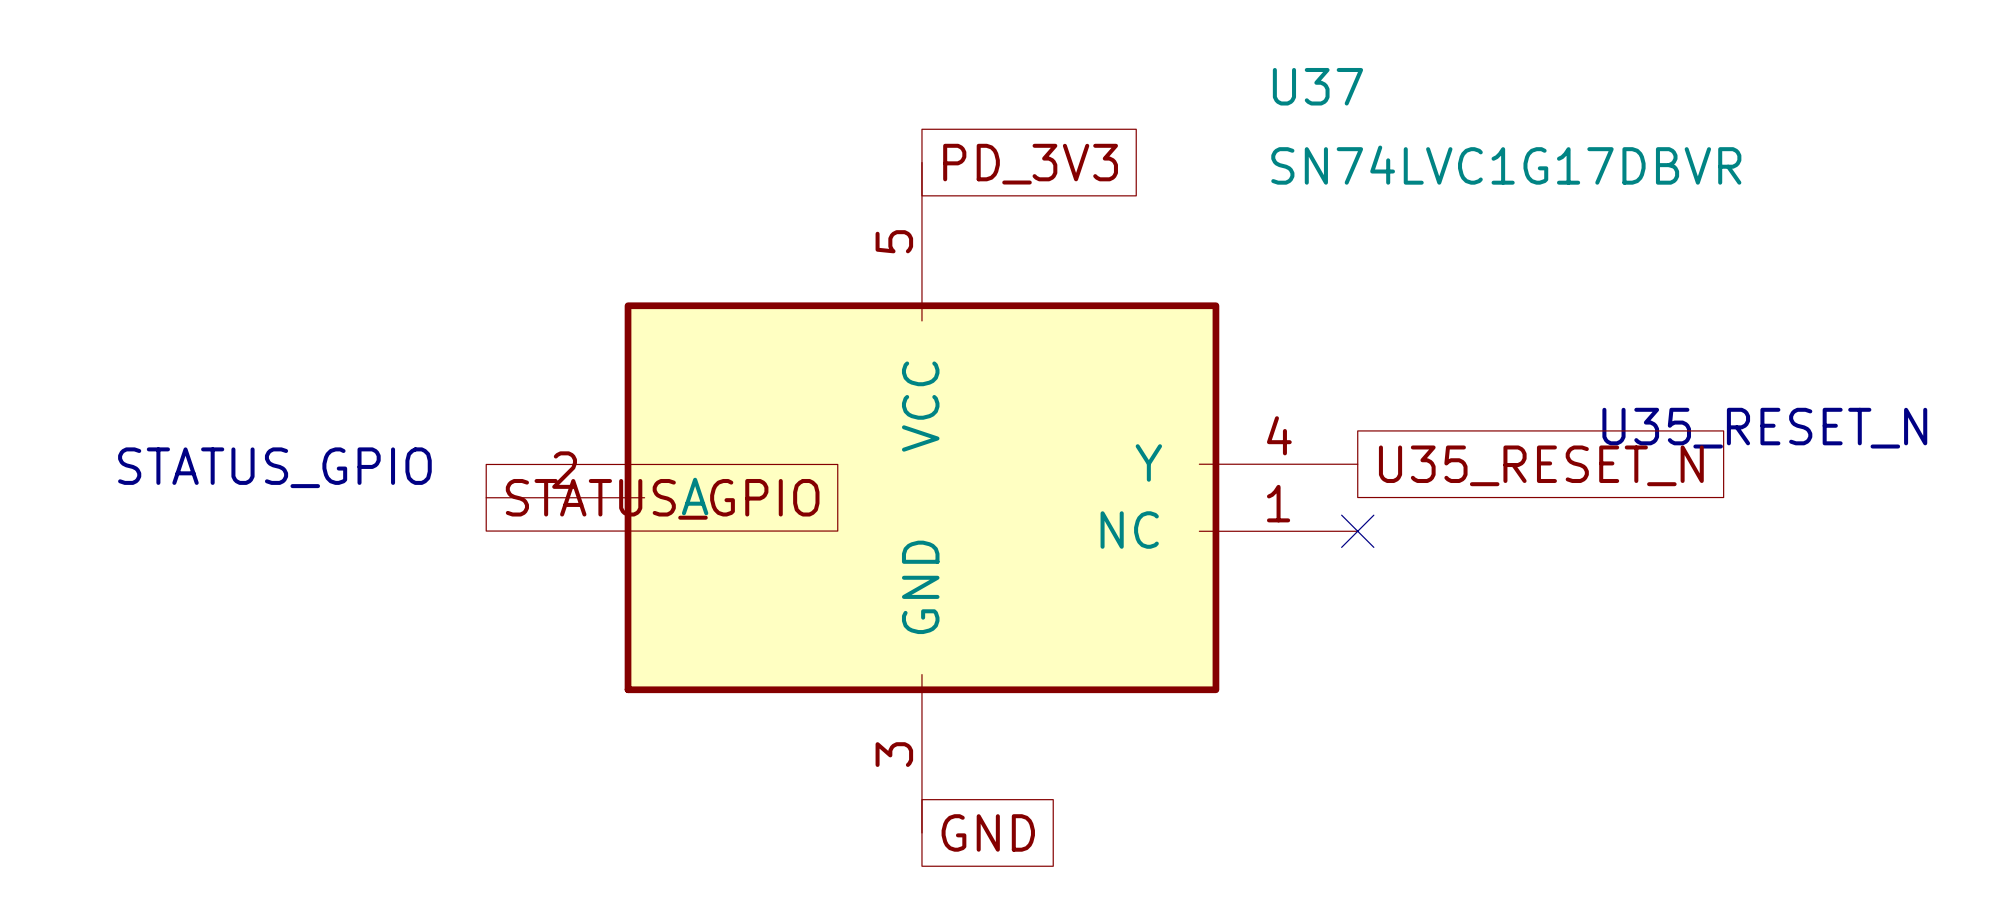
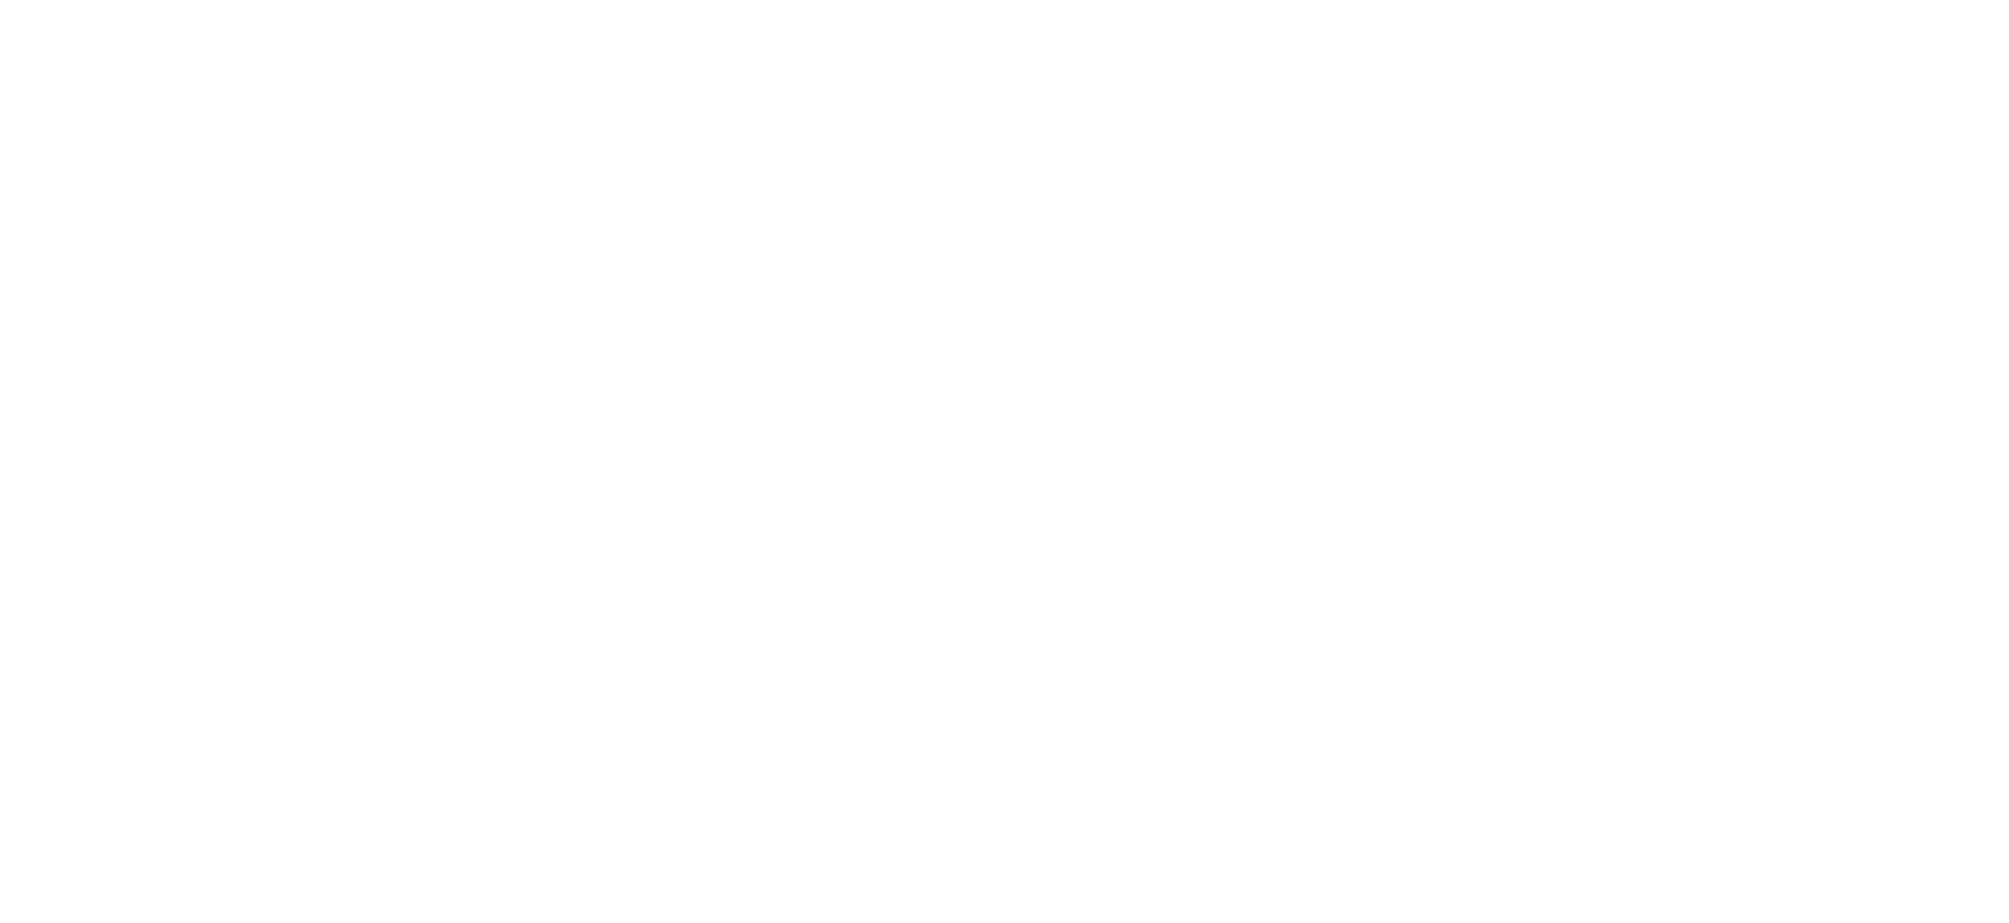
global label: PD_3V3 (1030, 164) -> none
text: U35_RESET_N (1764, 428) -> none
global label: U35_RESET_N (1541, 465) -> none
text: STATUS_GPIO (274, 467) -> none
U37: SN74LVC1G17DBVR (921, 497) -> none
global label: STATUS_GPIO (662, 499) -> none
no-connect mark: (1357, 531) -> none
global label: GND (988, 832) -> none

